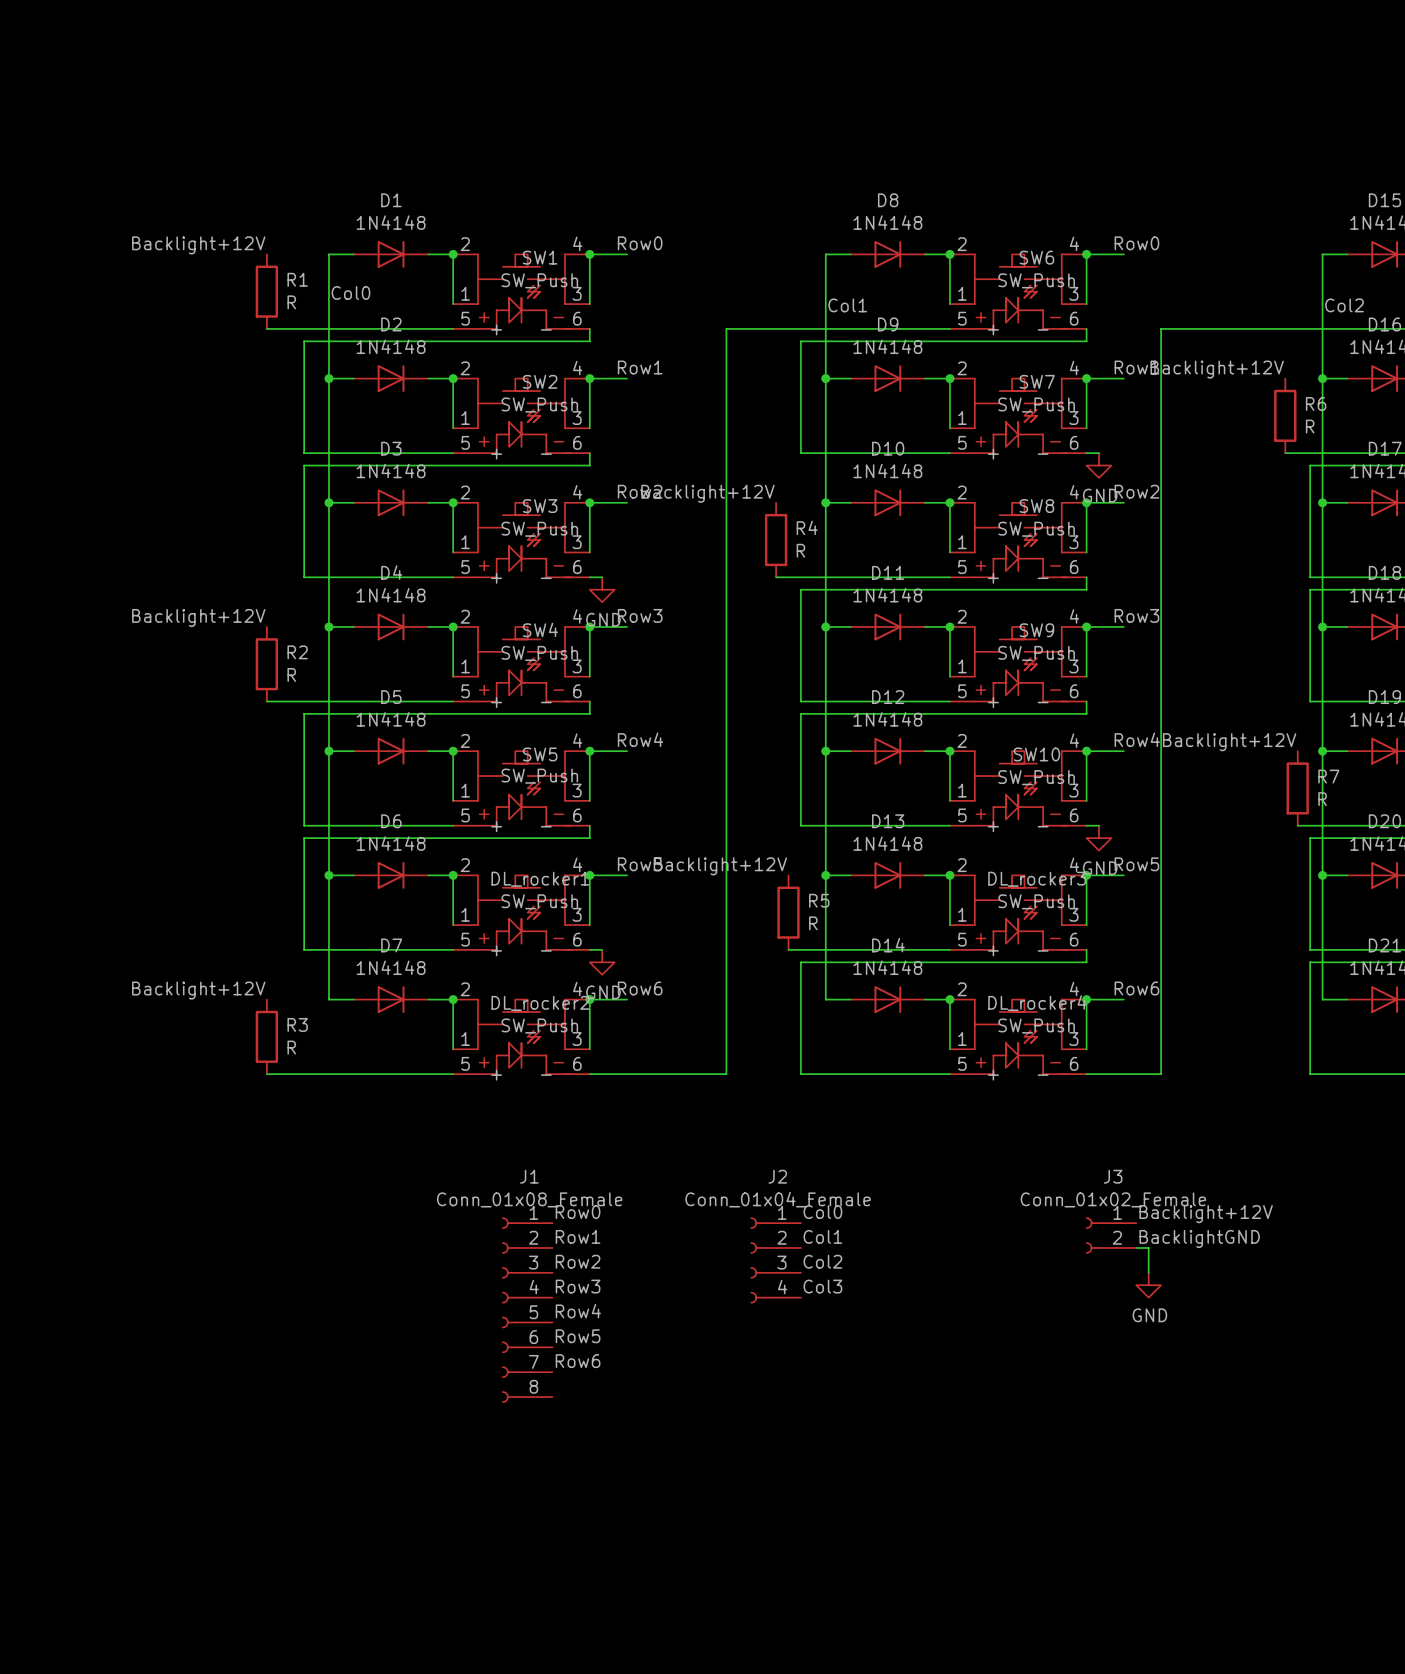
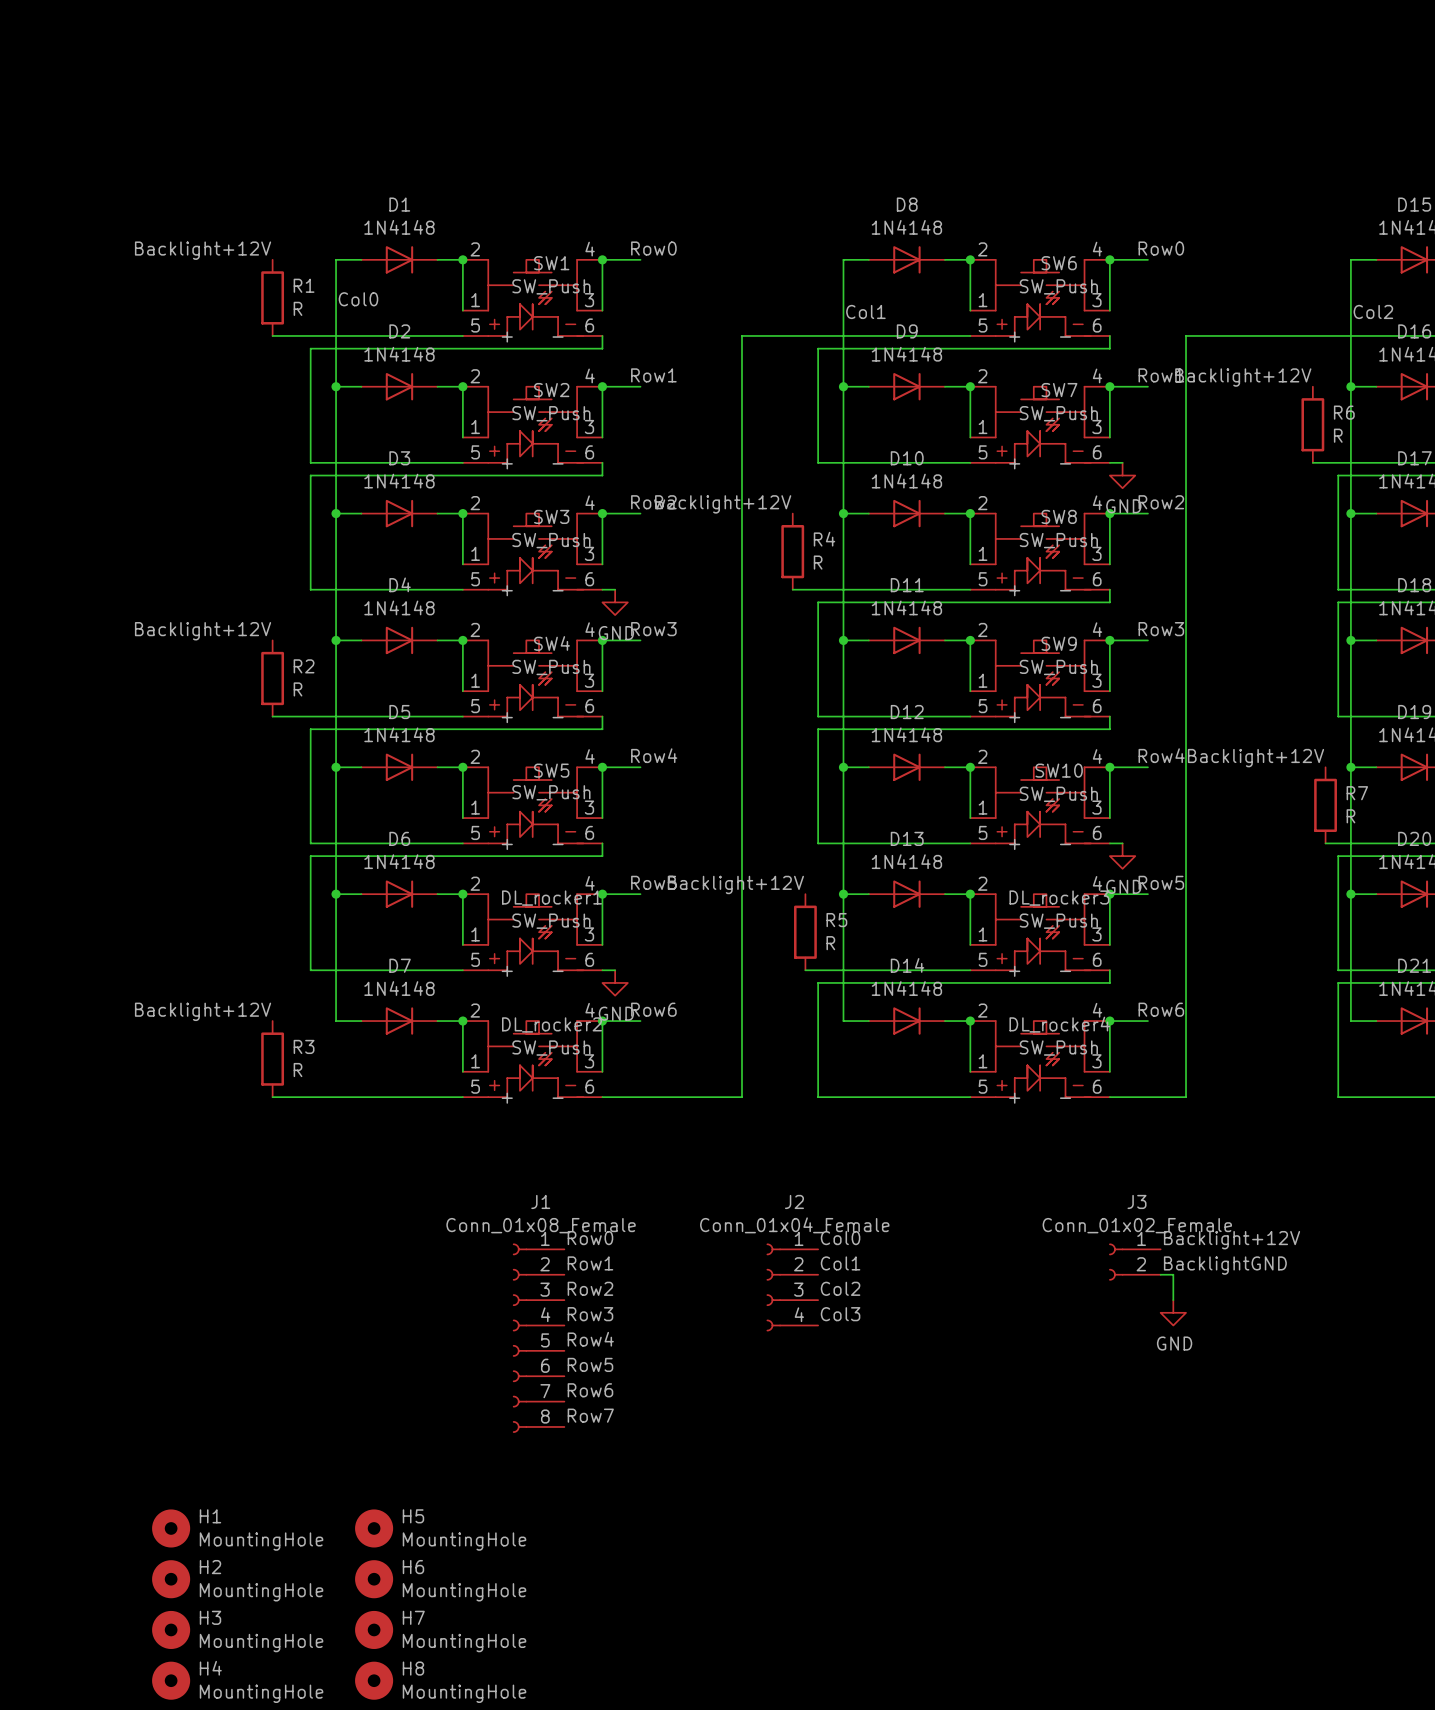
label: none -> Row7 (590, 1415)
H1: none -> MountingHole (171, 1528)
H5: none -> MountingHole (374, 1528)
H2: none -> MountingHole (171, 1579)
H6: none -> MountingHole (374, 1579)
H3: none -> MountingHole (171, 1629)
H7: none -> MountingHole (374, 1629)
H4: none -> MountingHole (171, 1680)
H8: none -> MountingHole (374, 1680)

